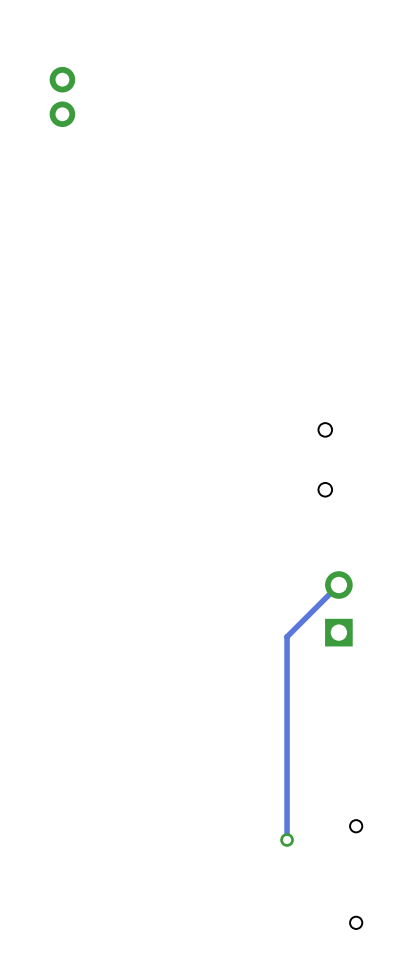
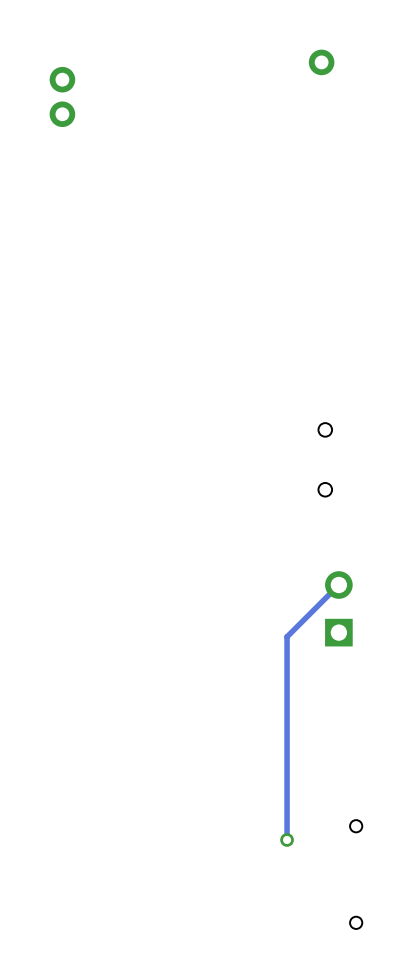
part: none -> (321, 62)

